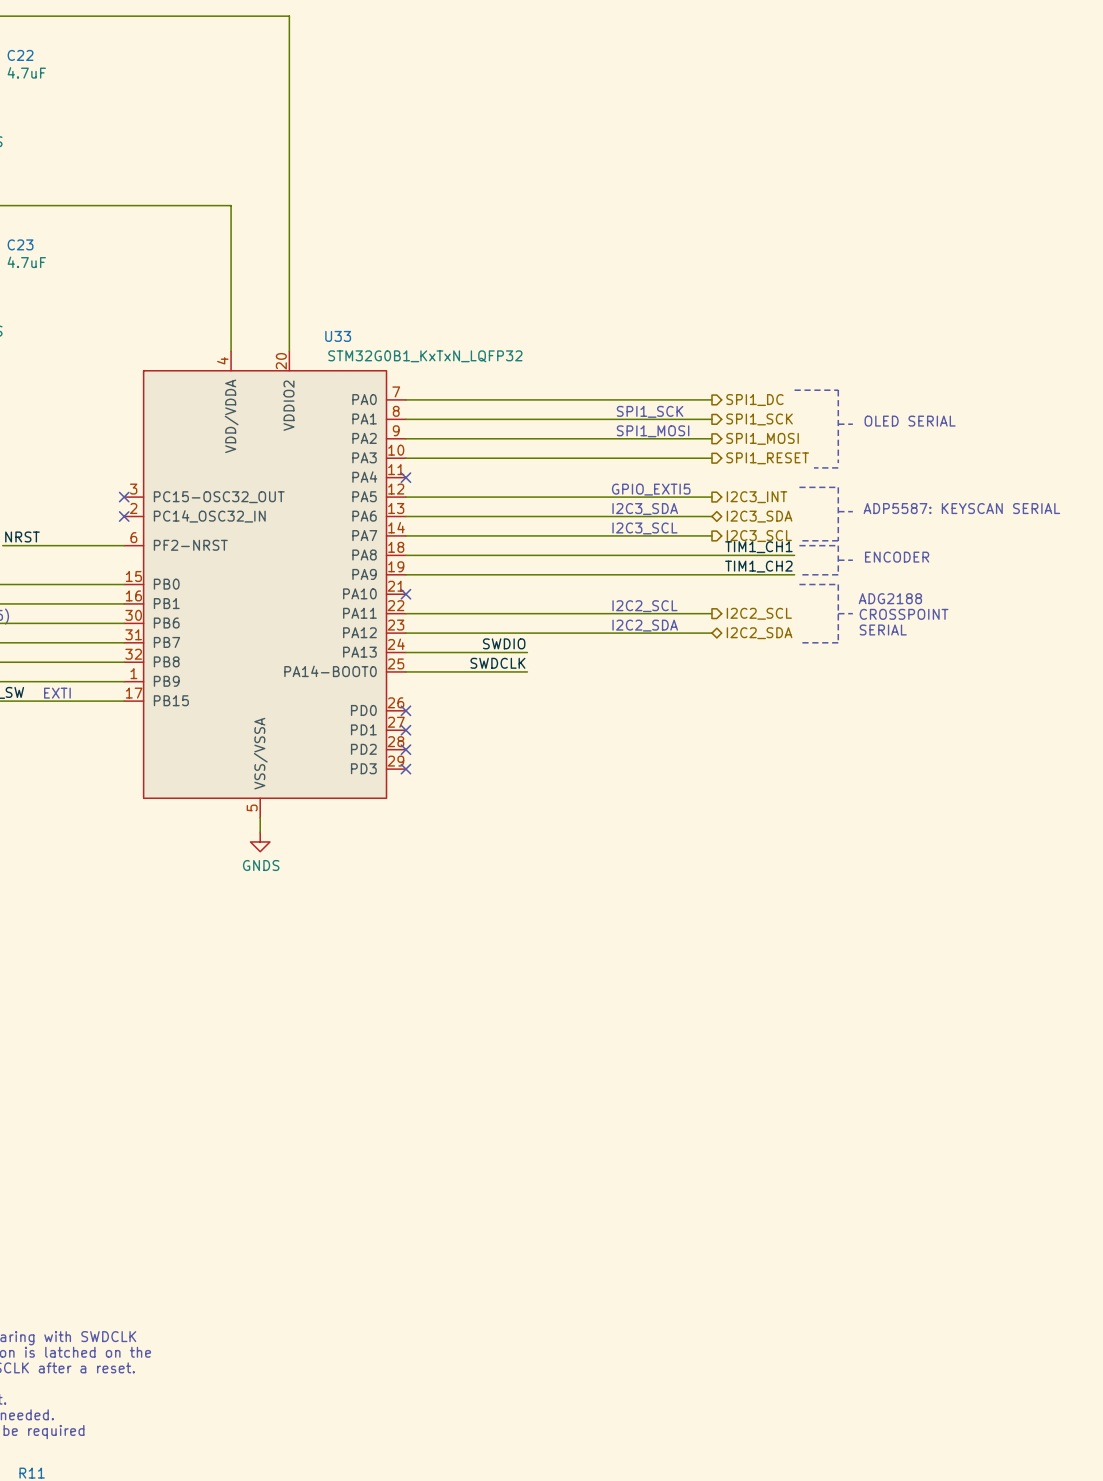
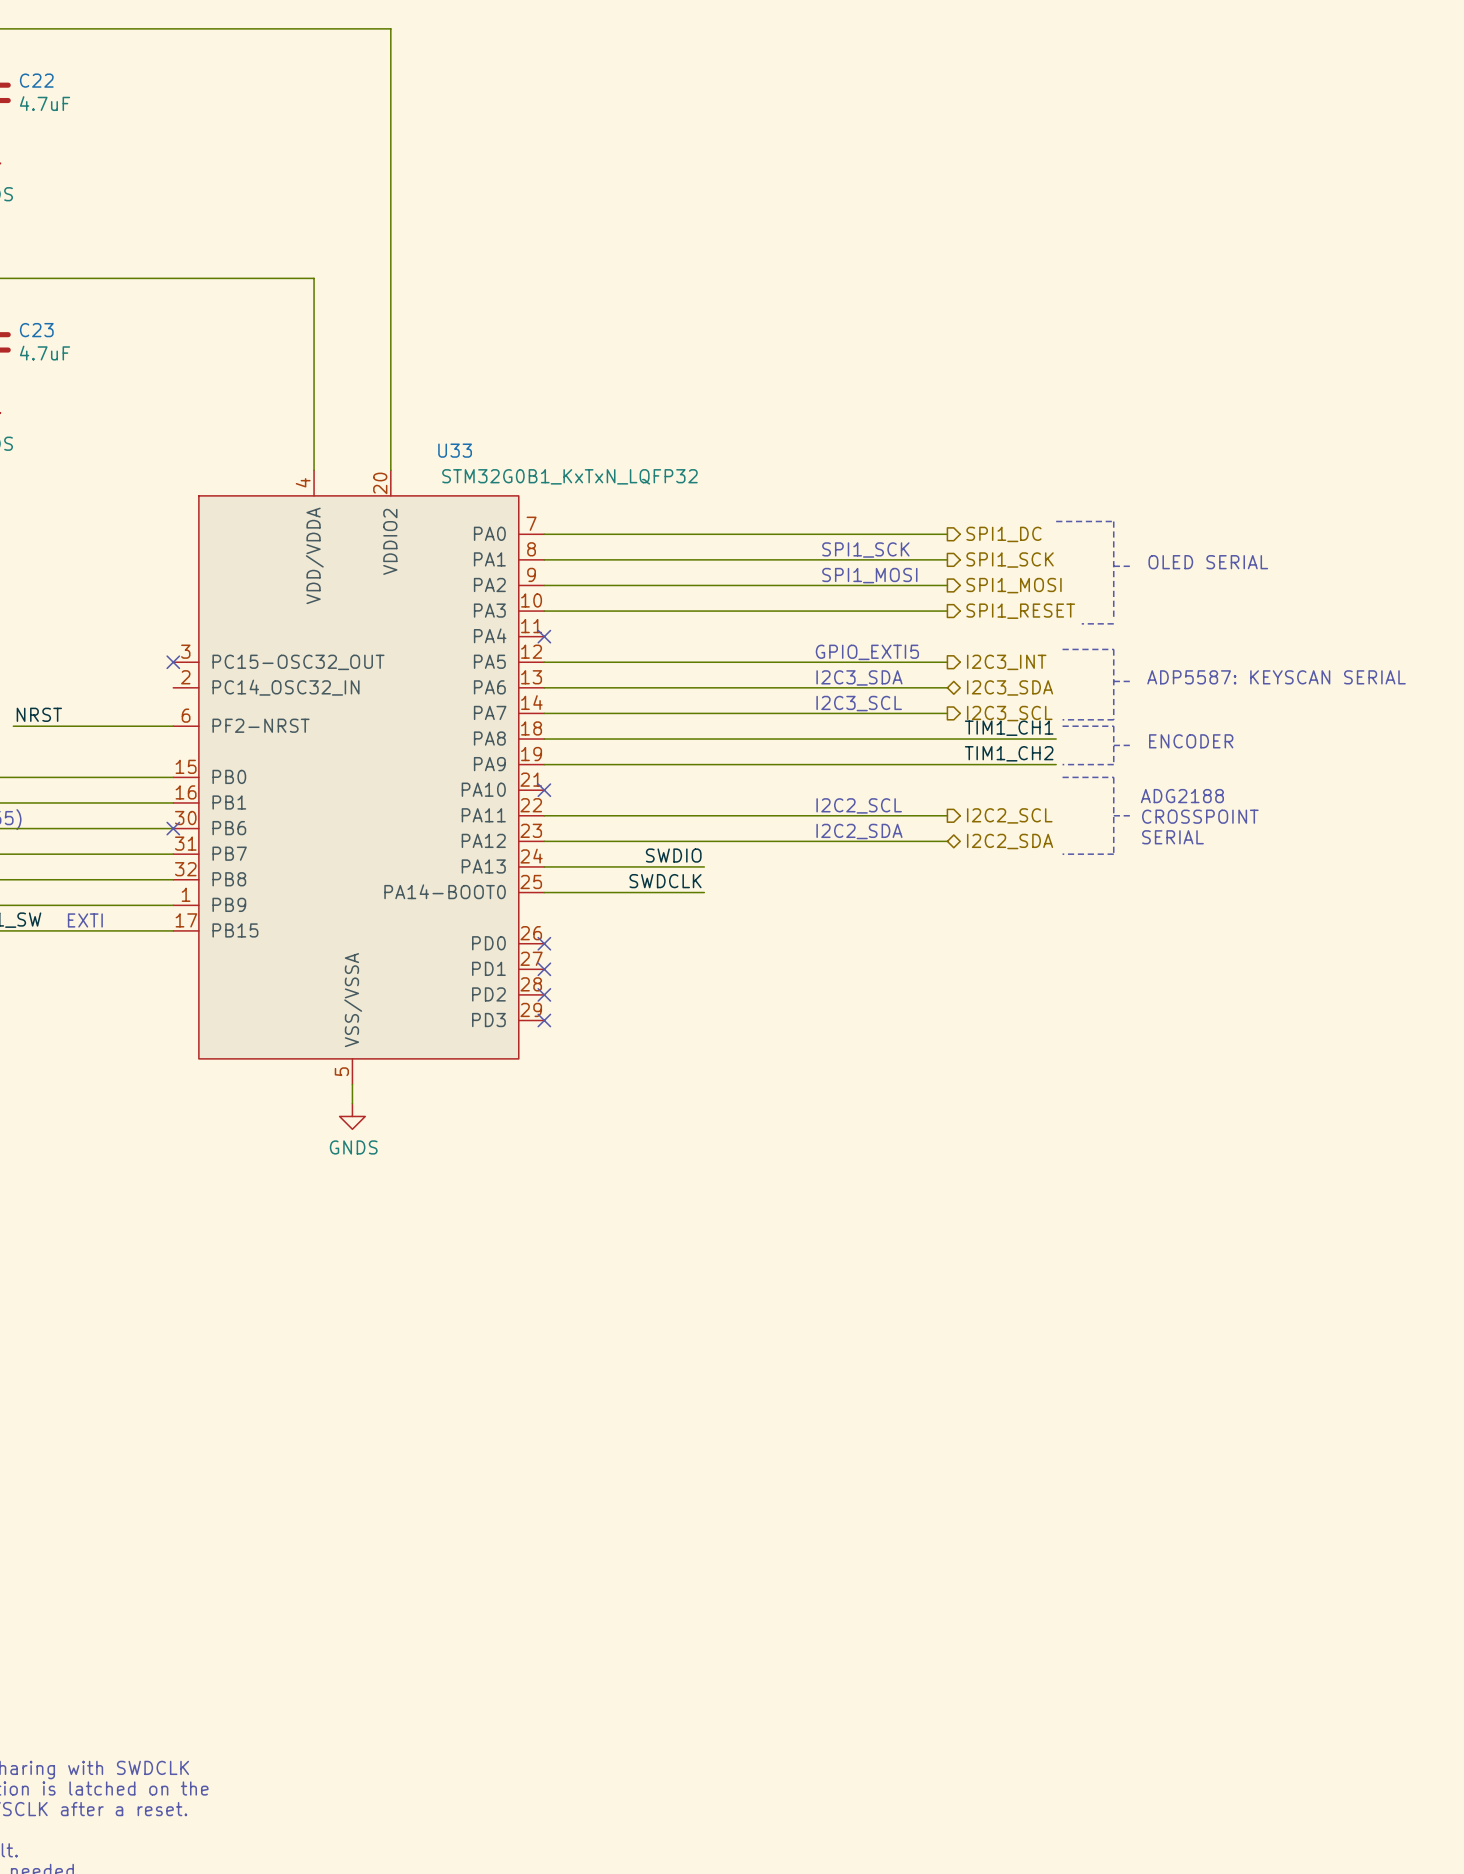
no-connect mark: (124, 516) -> none
no-connect mark: none -> (173, 828)

